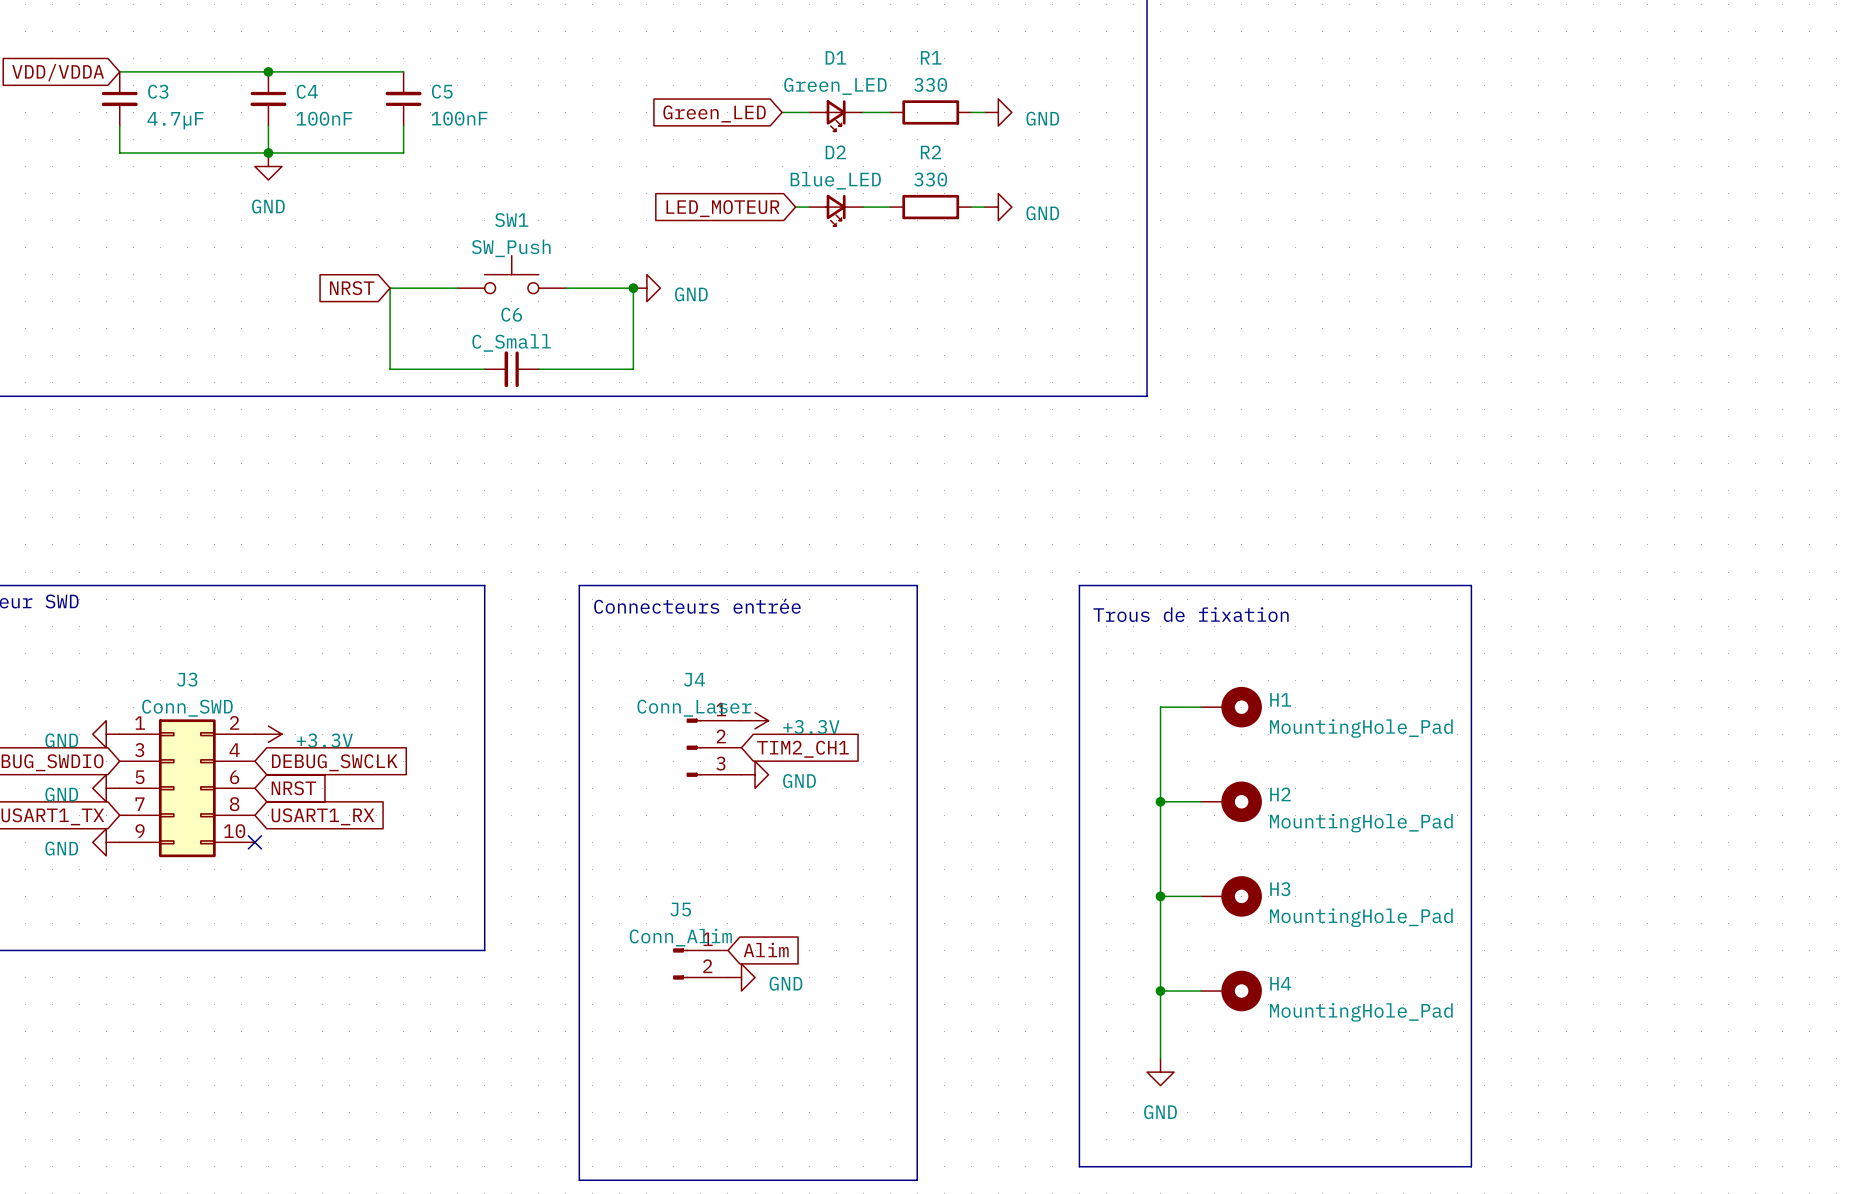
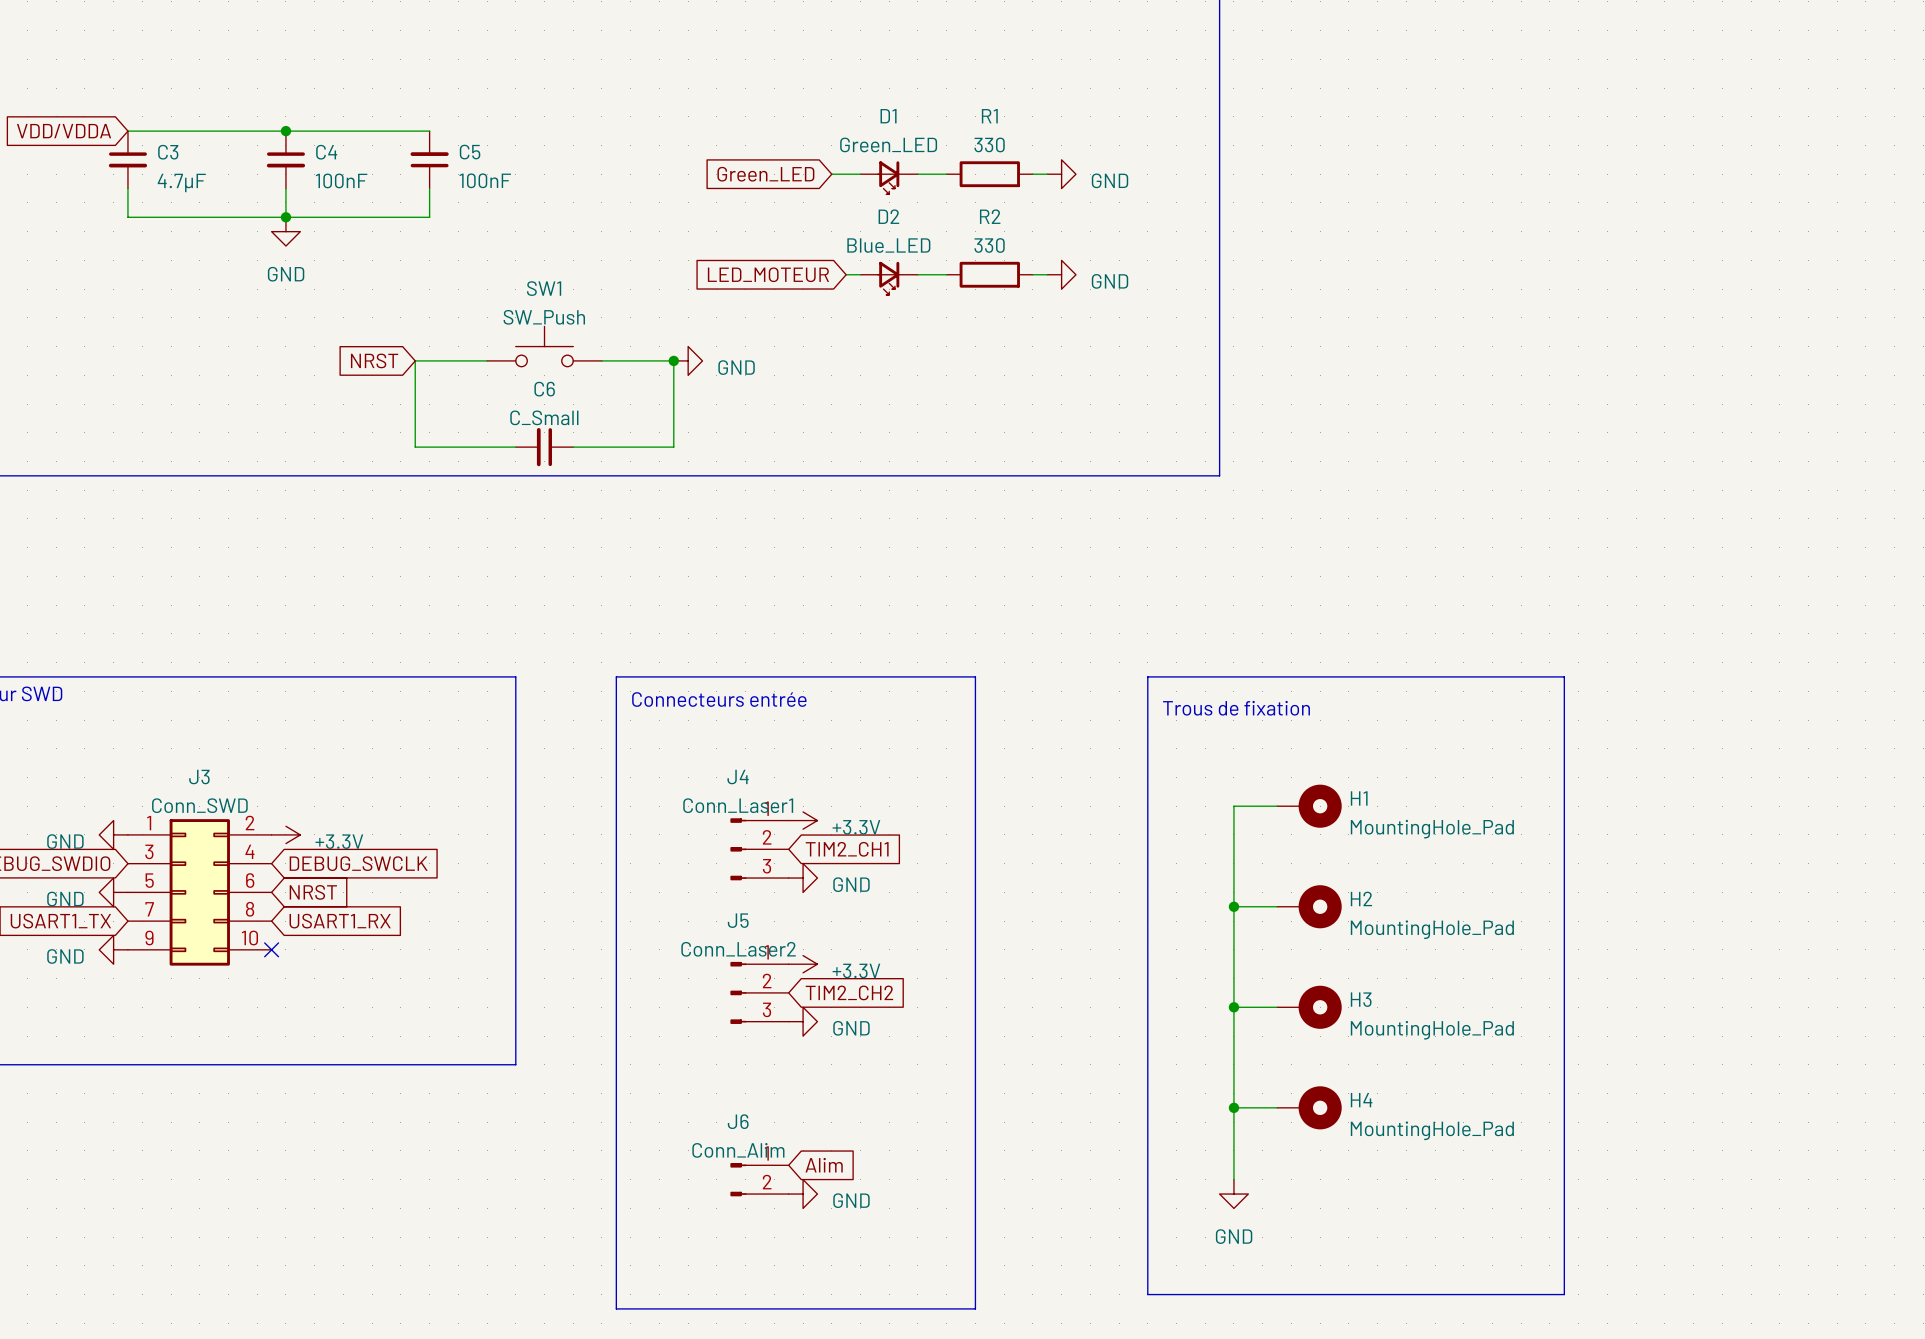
J4 value: Conn_Laser (694, 708) -> Conn_Laser1 (738, 805)
power symbol: none -> +3.3V (803, 964)
global label: none -> TIM2_CH2 (849, 992)
power symbol: none -> GND (803, 1021)
J5 value: Conn_Alim (680, 937) -> Conn_Laser2 (738, 949)
J5 symbol: [673, 948, 728, 980] -> [730, 961, 789, 1024]
global label position: Alim (766, 949) -> Alim (824, 1165)
power symbol: GND (741, 977) -> none
J6: none -> Conn_Alim (759, 1179)
power symbol: none -> GND (803, 1194)

